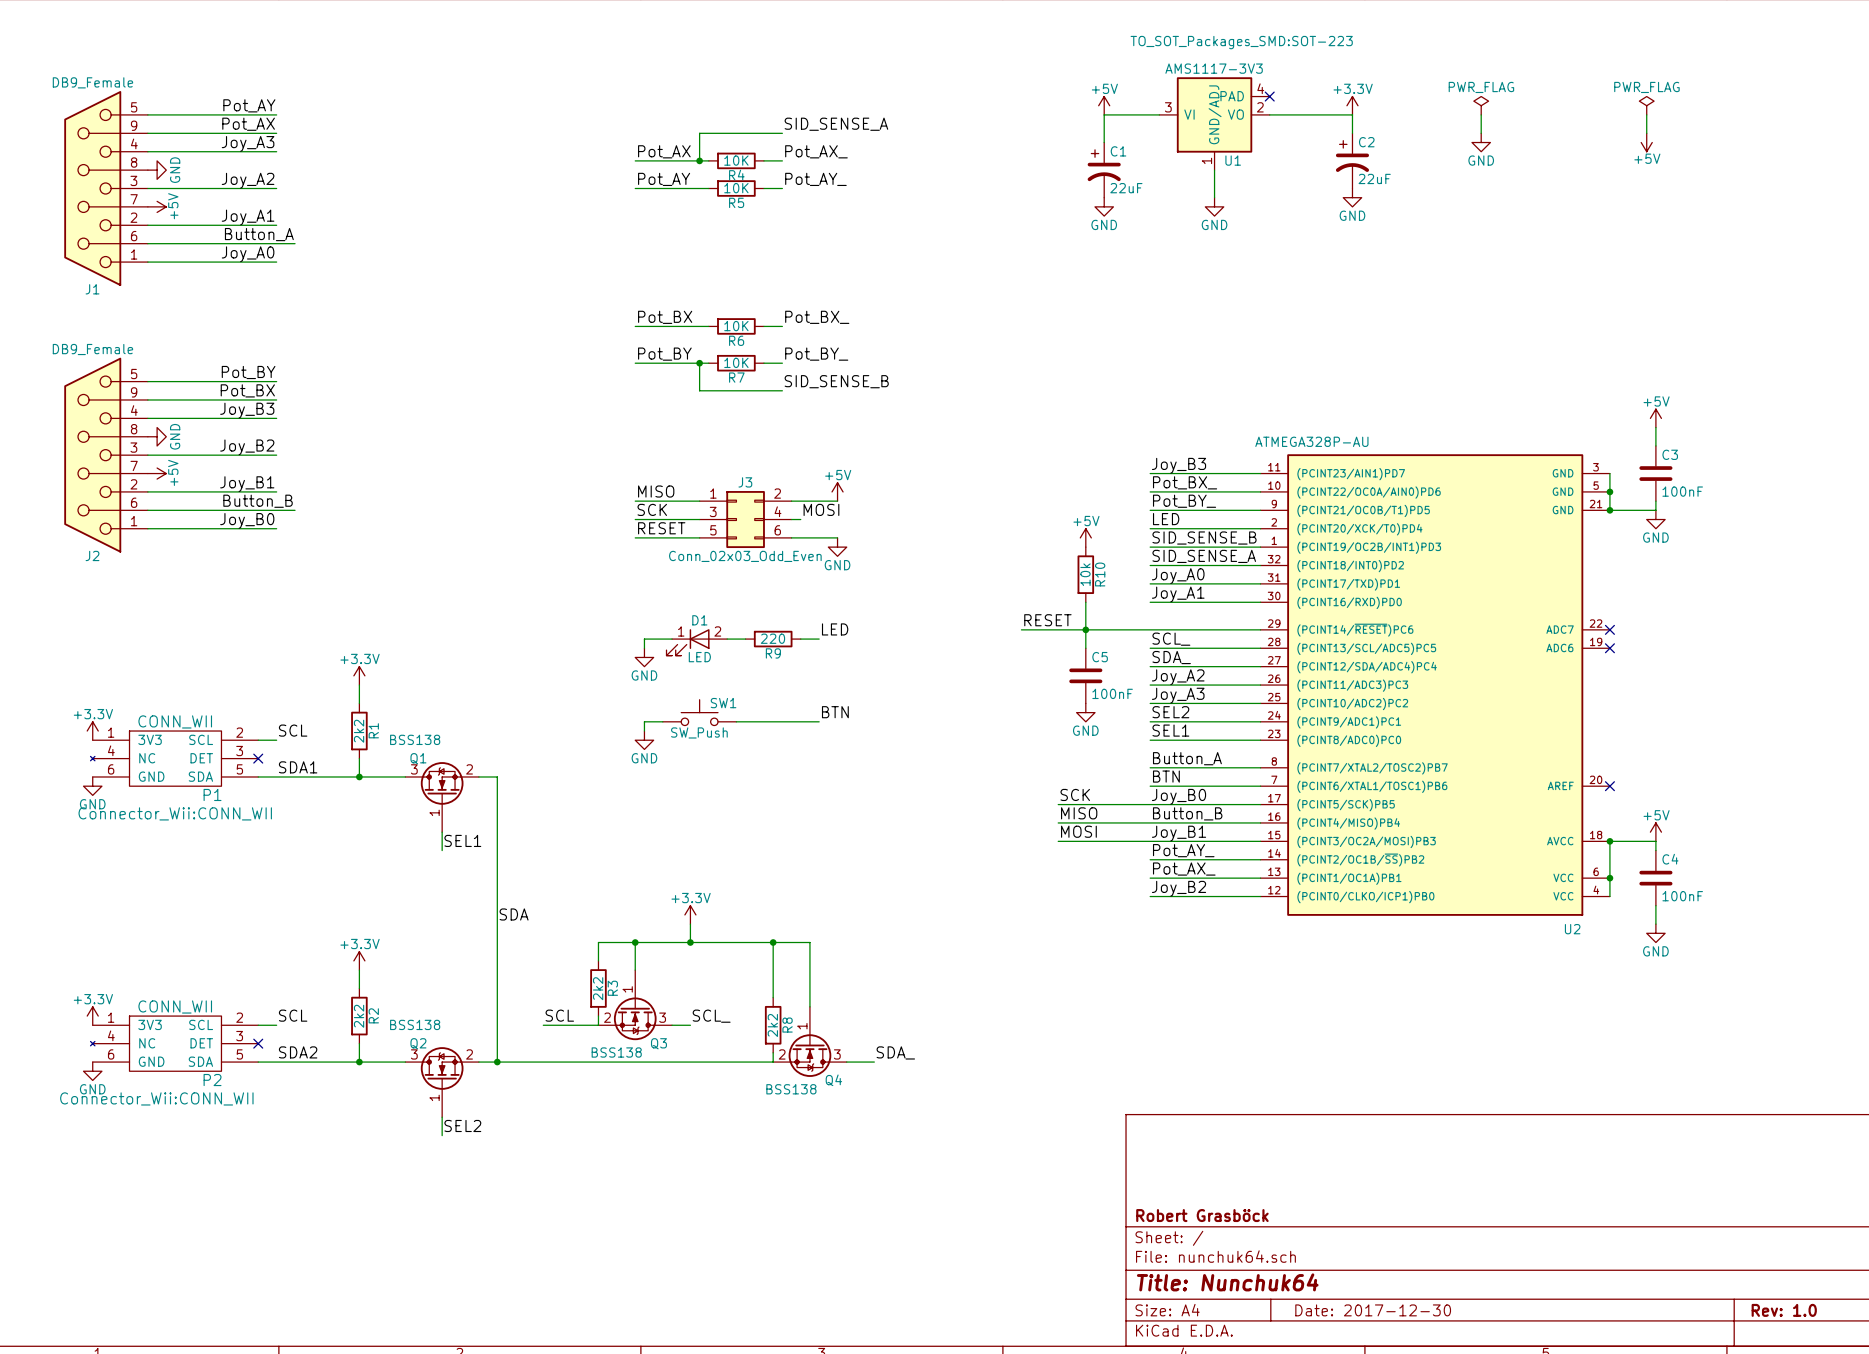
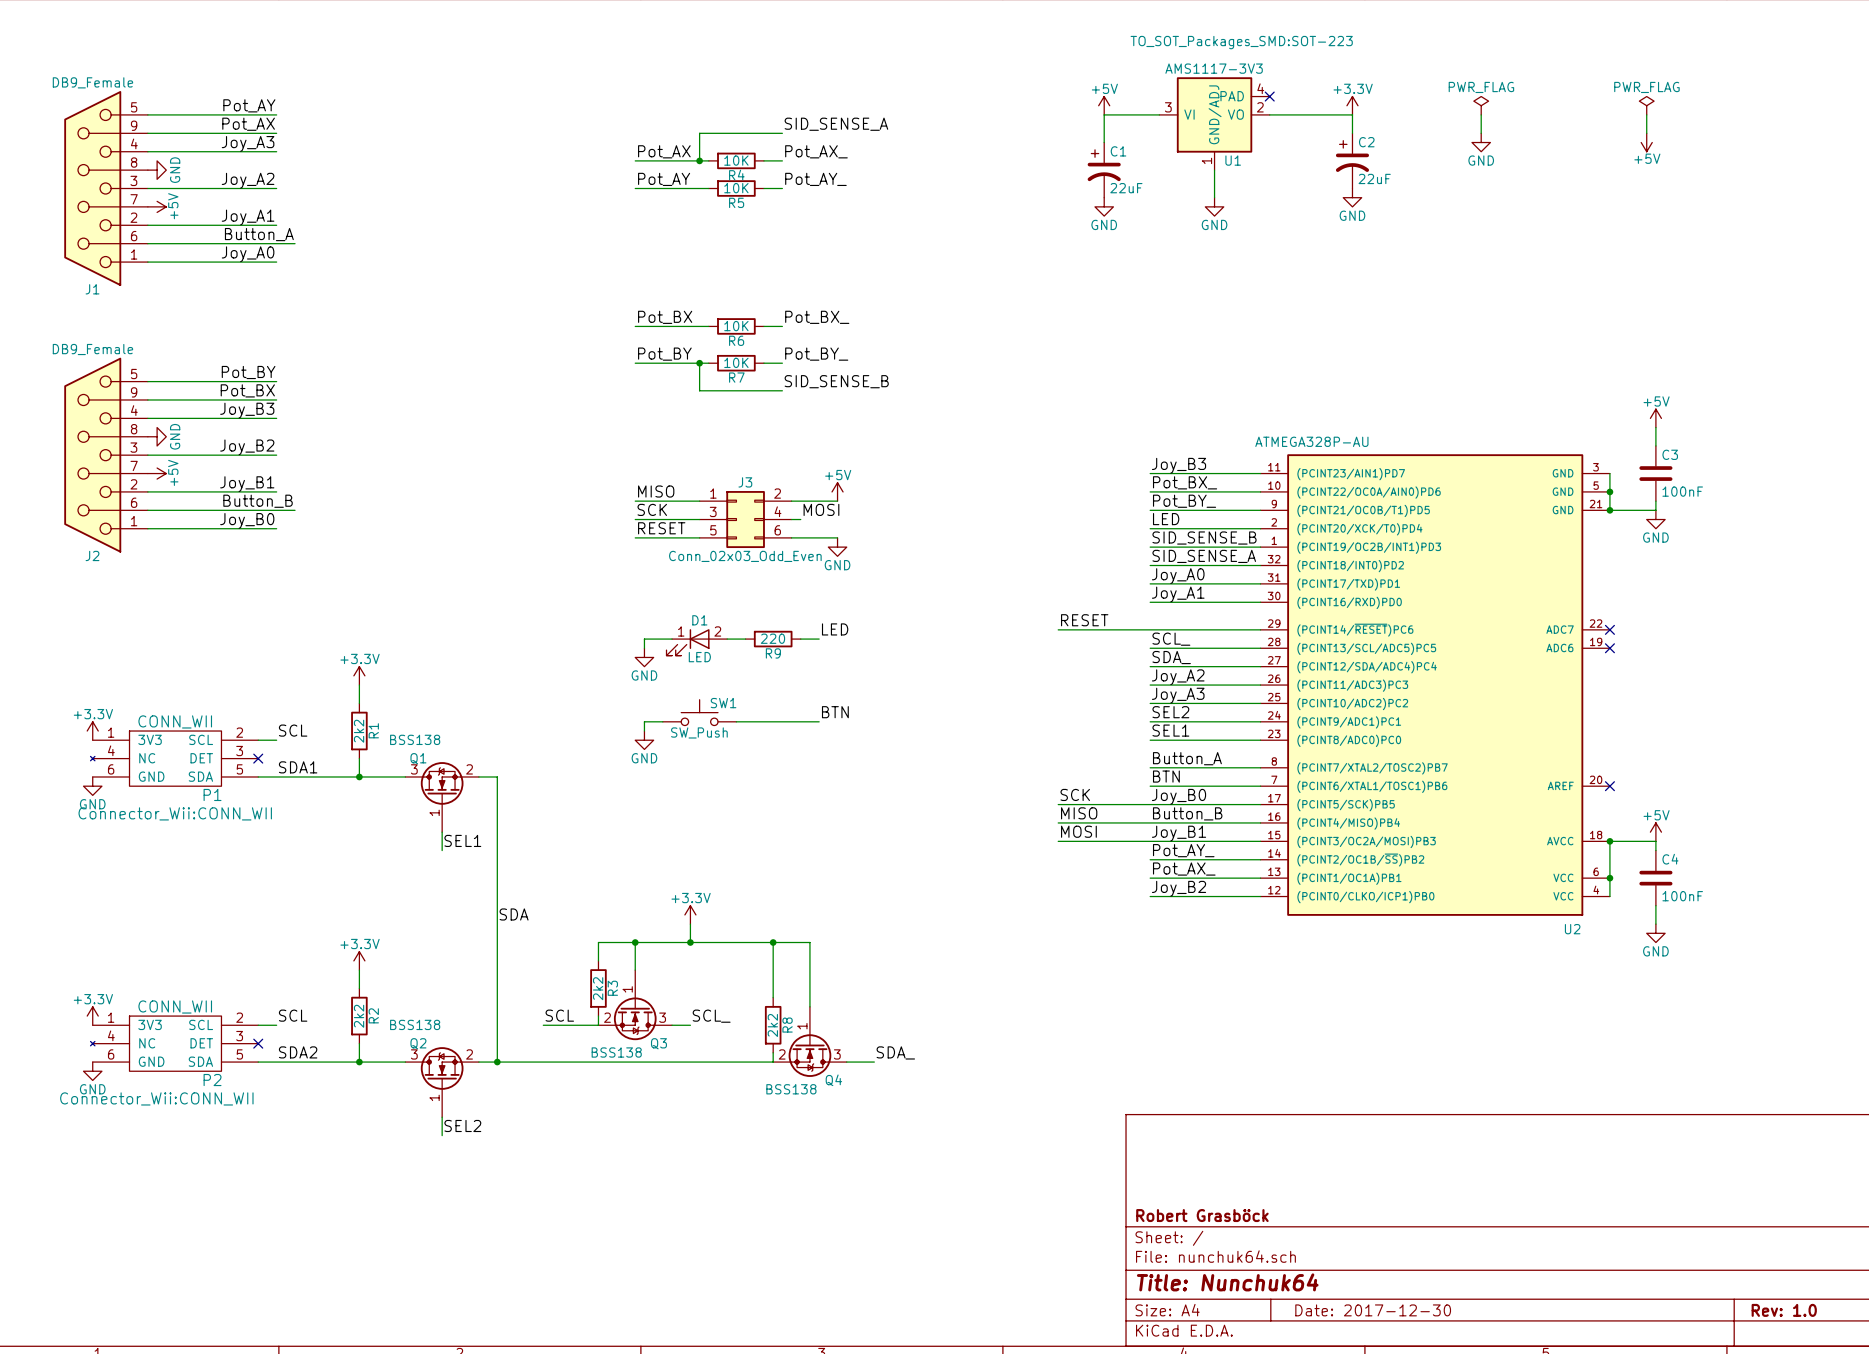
power symbol: +5V (1085, 537) -> none
R10: 10k (1085, 574) -> none
wire: (1085, 602) (1085, 648) -> none
label position: RESET (1047, 620) -> RESET (1084, 620)
wire: (1021, 629) (1058, 629) -> none
junction: (1085, 629) -> none
C5: 100nF (1085, 675) -> none
power symbol: GND (1085, 712) -> none

